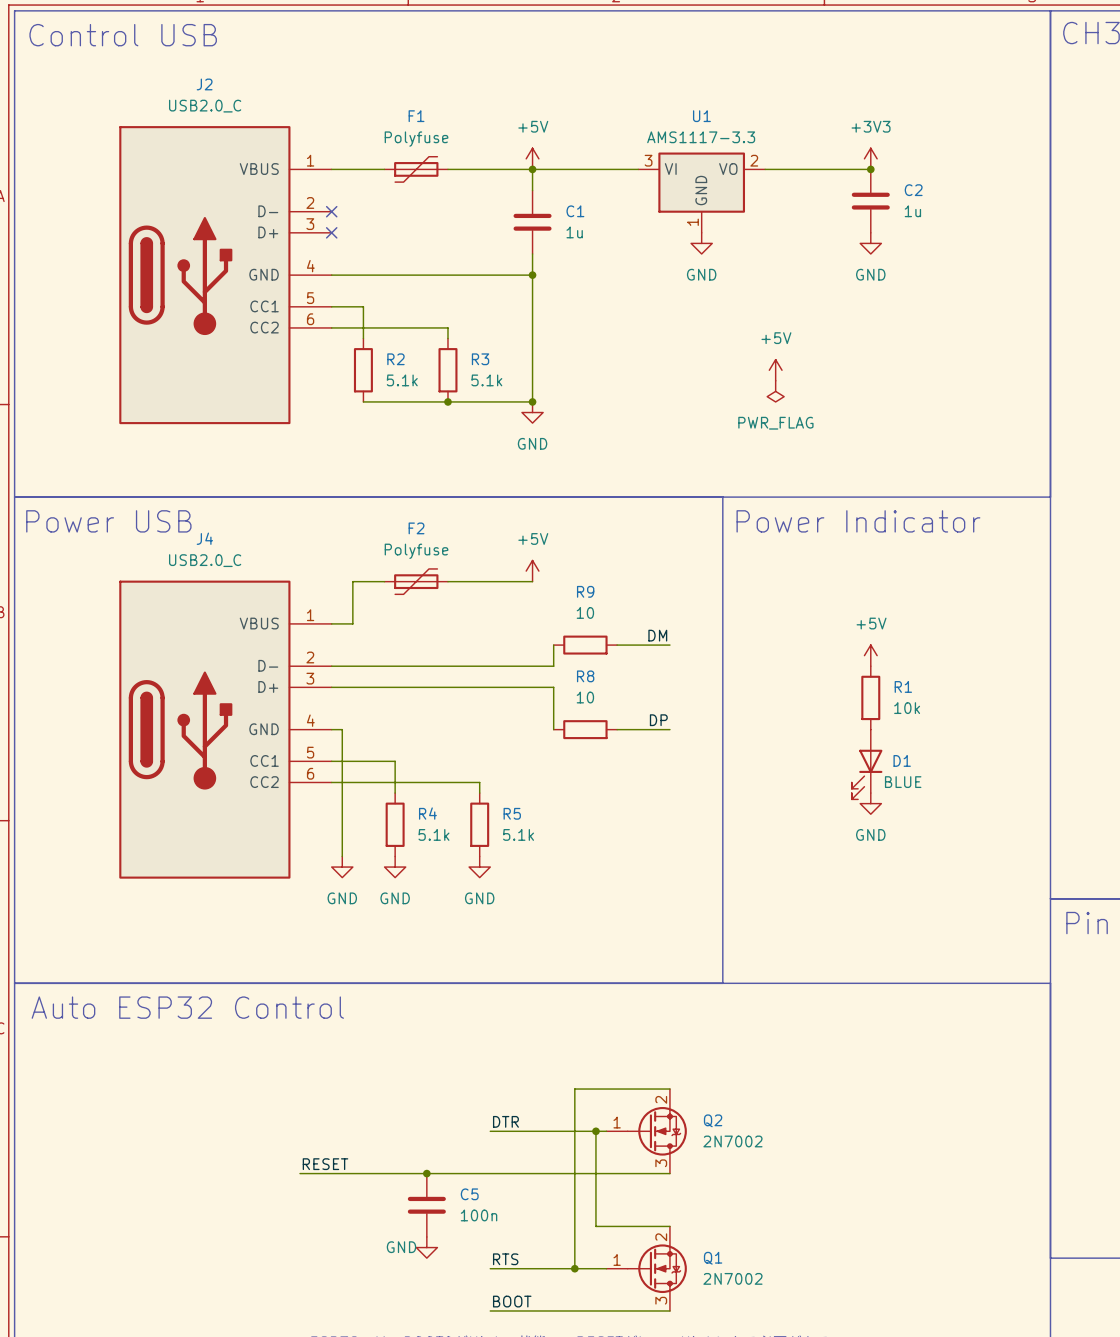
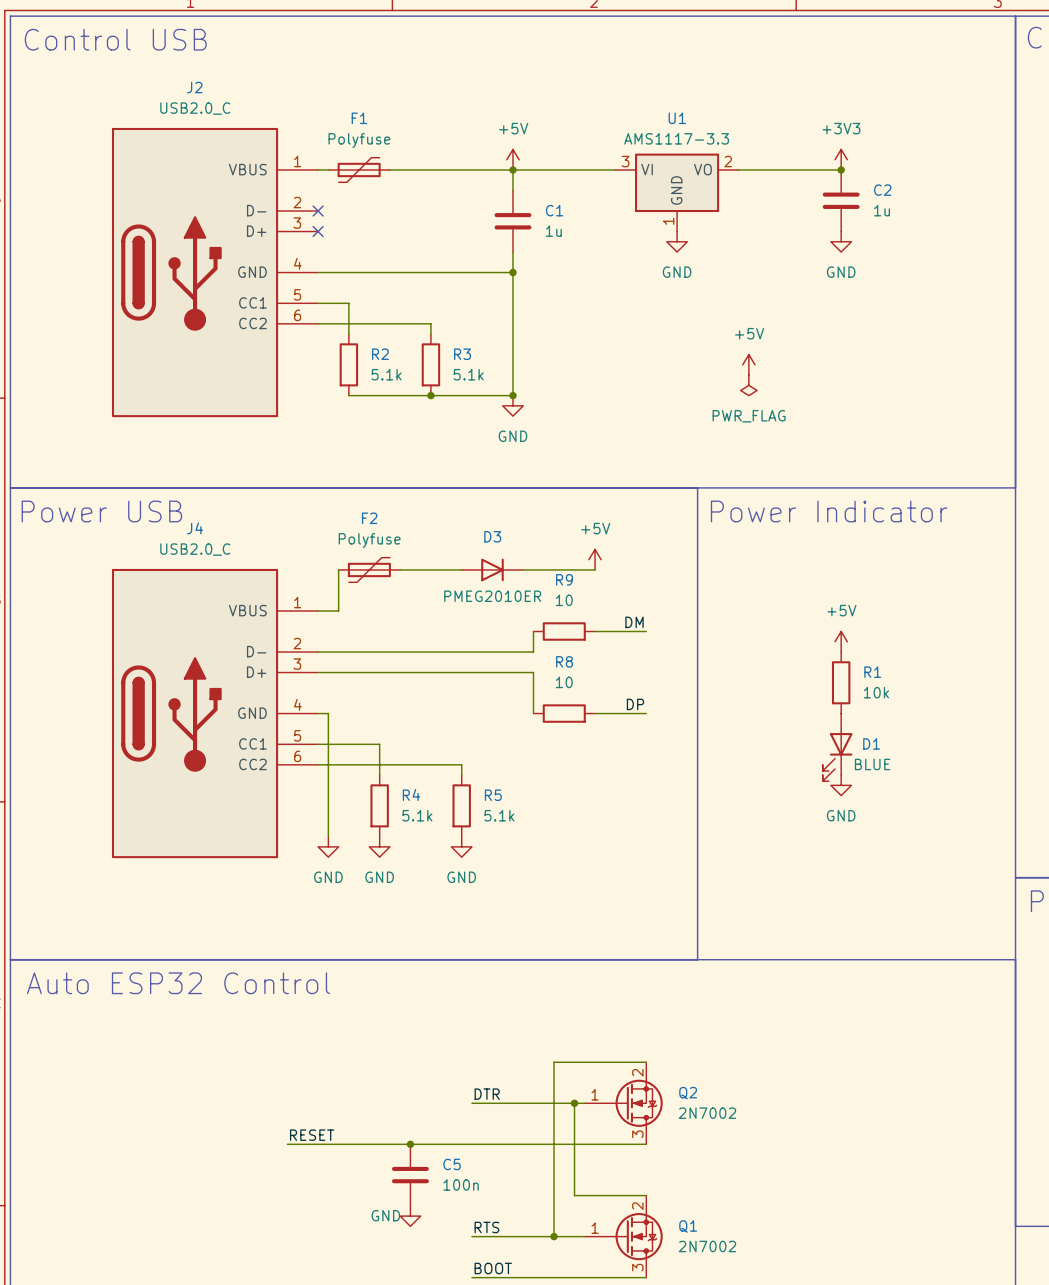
F1 position: (416, 169) -> (359, 169)
power symbol position: +5V (532, 571) -> +5V (595, 559)
F2 position: (416, 581) -> (369, 569)
D3: none -> PMEG2010ER (492, 569)
wire: none -> (523, 569) (595, 569)

